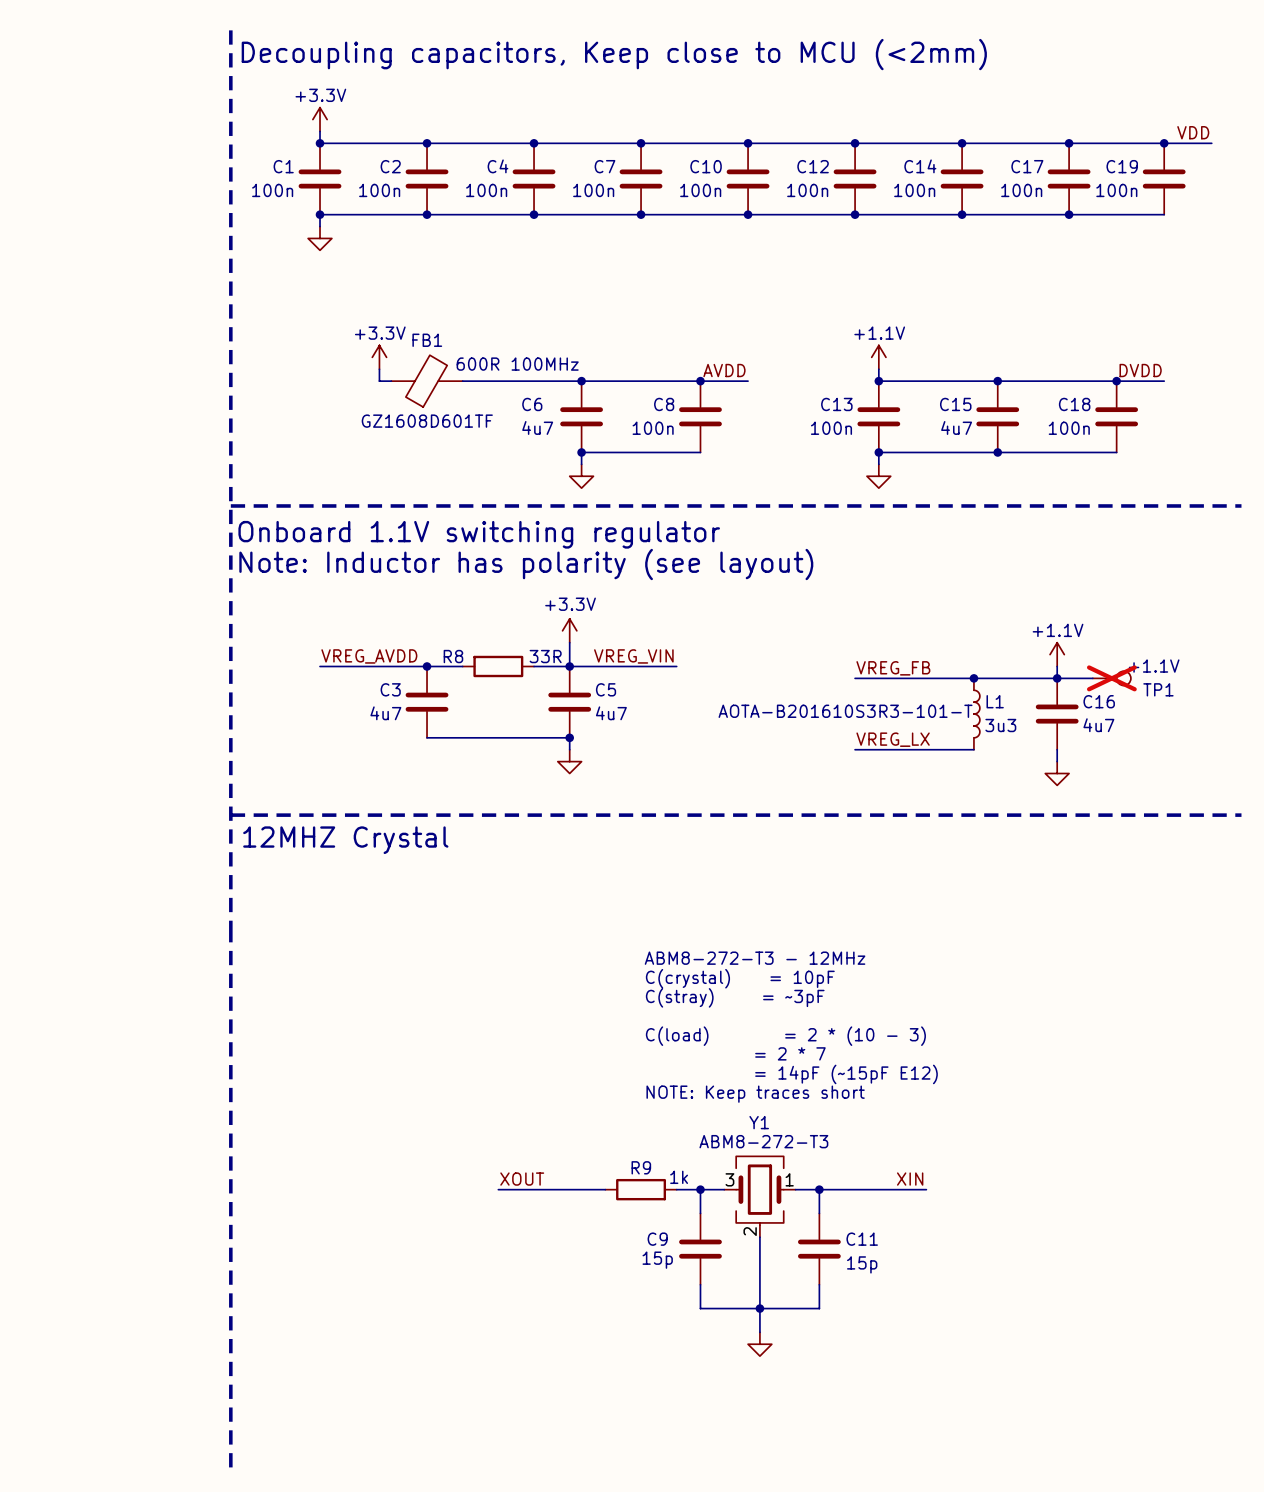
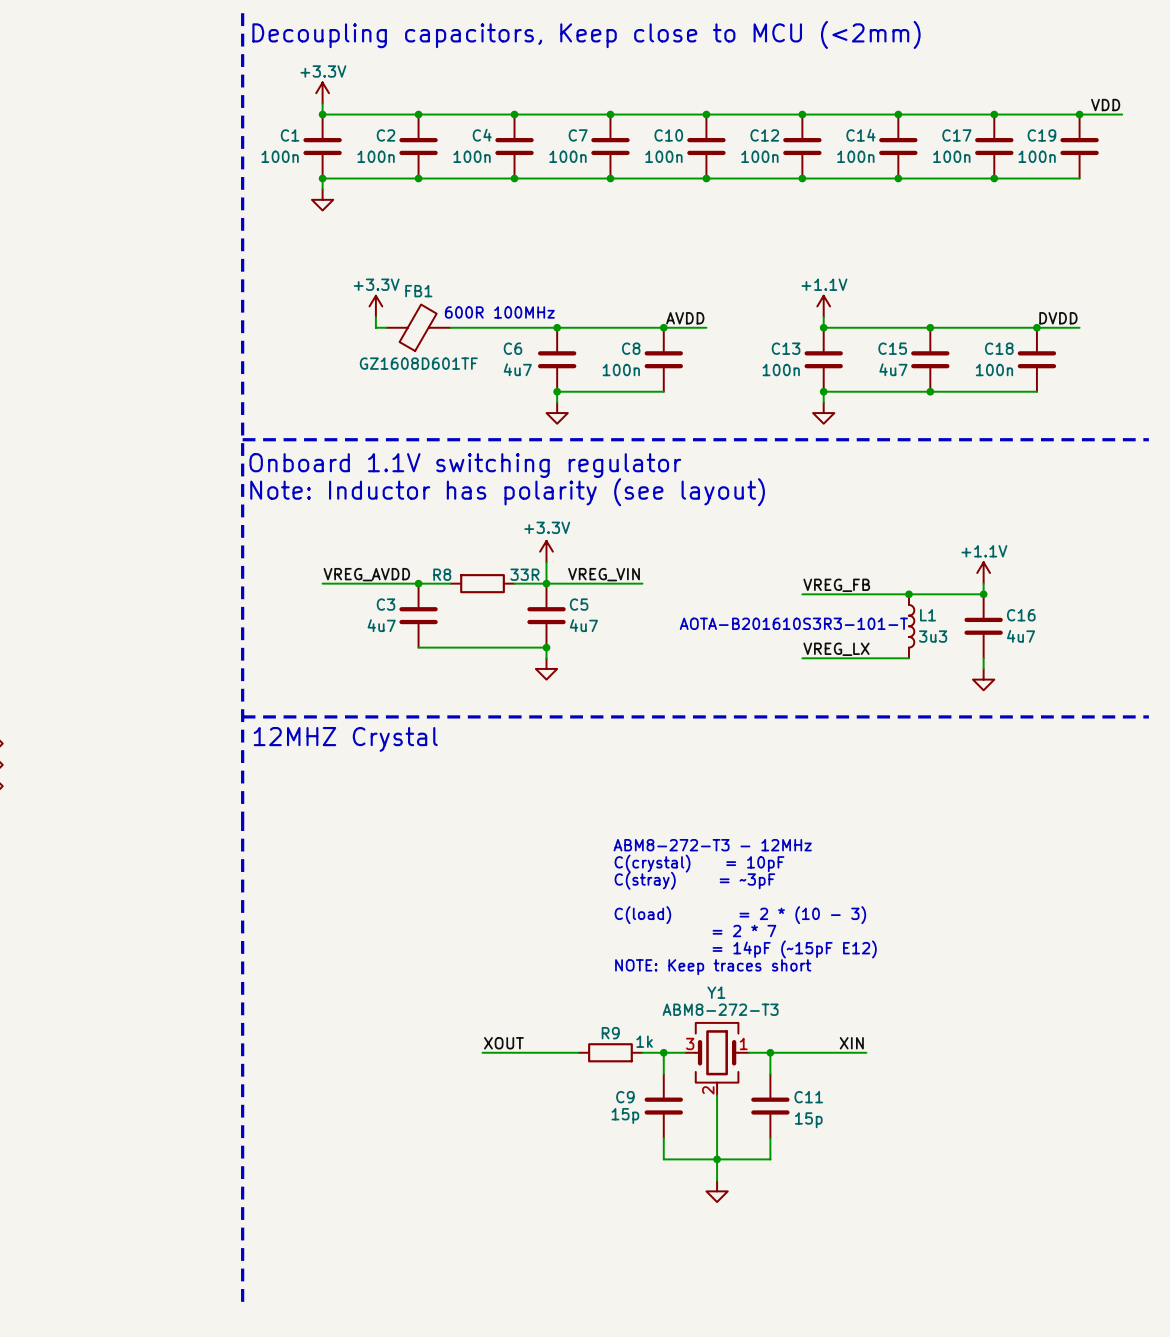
wire: (1057, 678) (1092, 678) -> none
TP1: +1.1V (1111, 678) -> none

